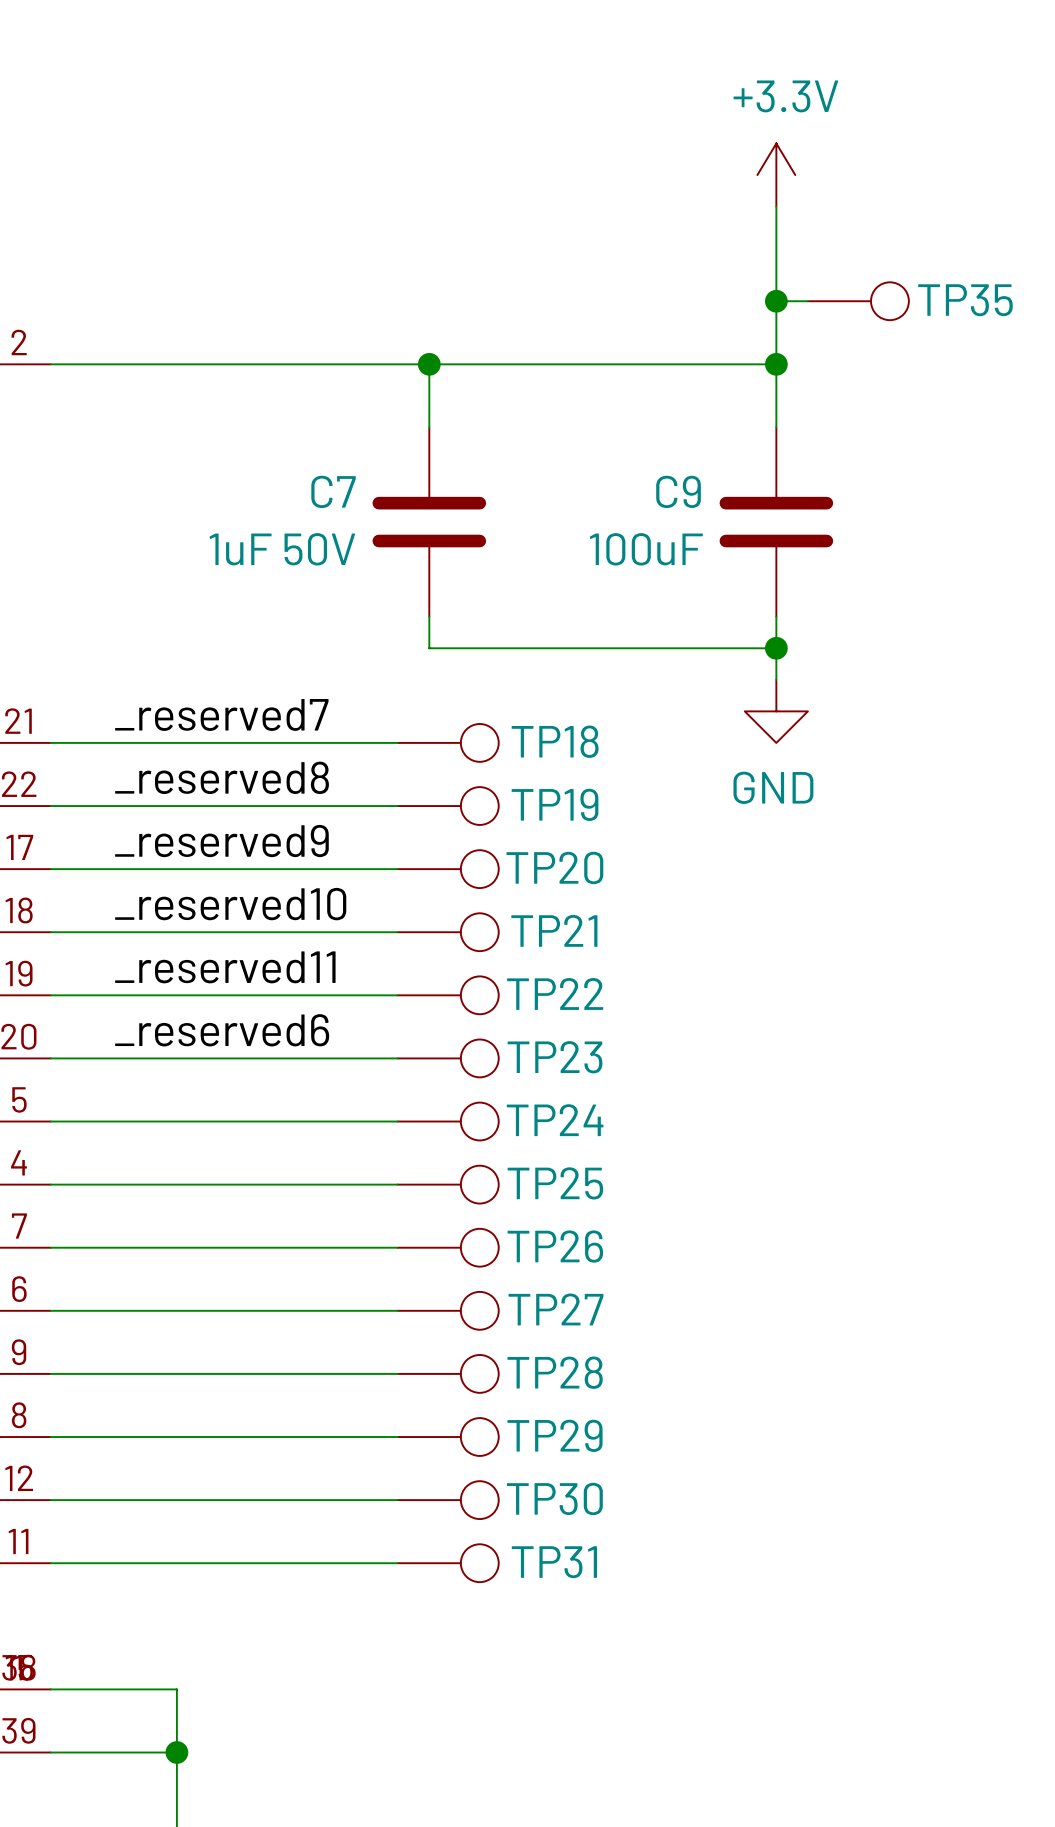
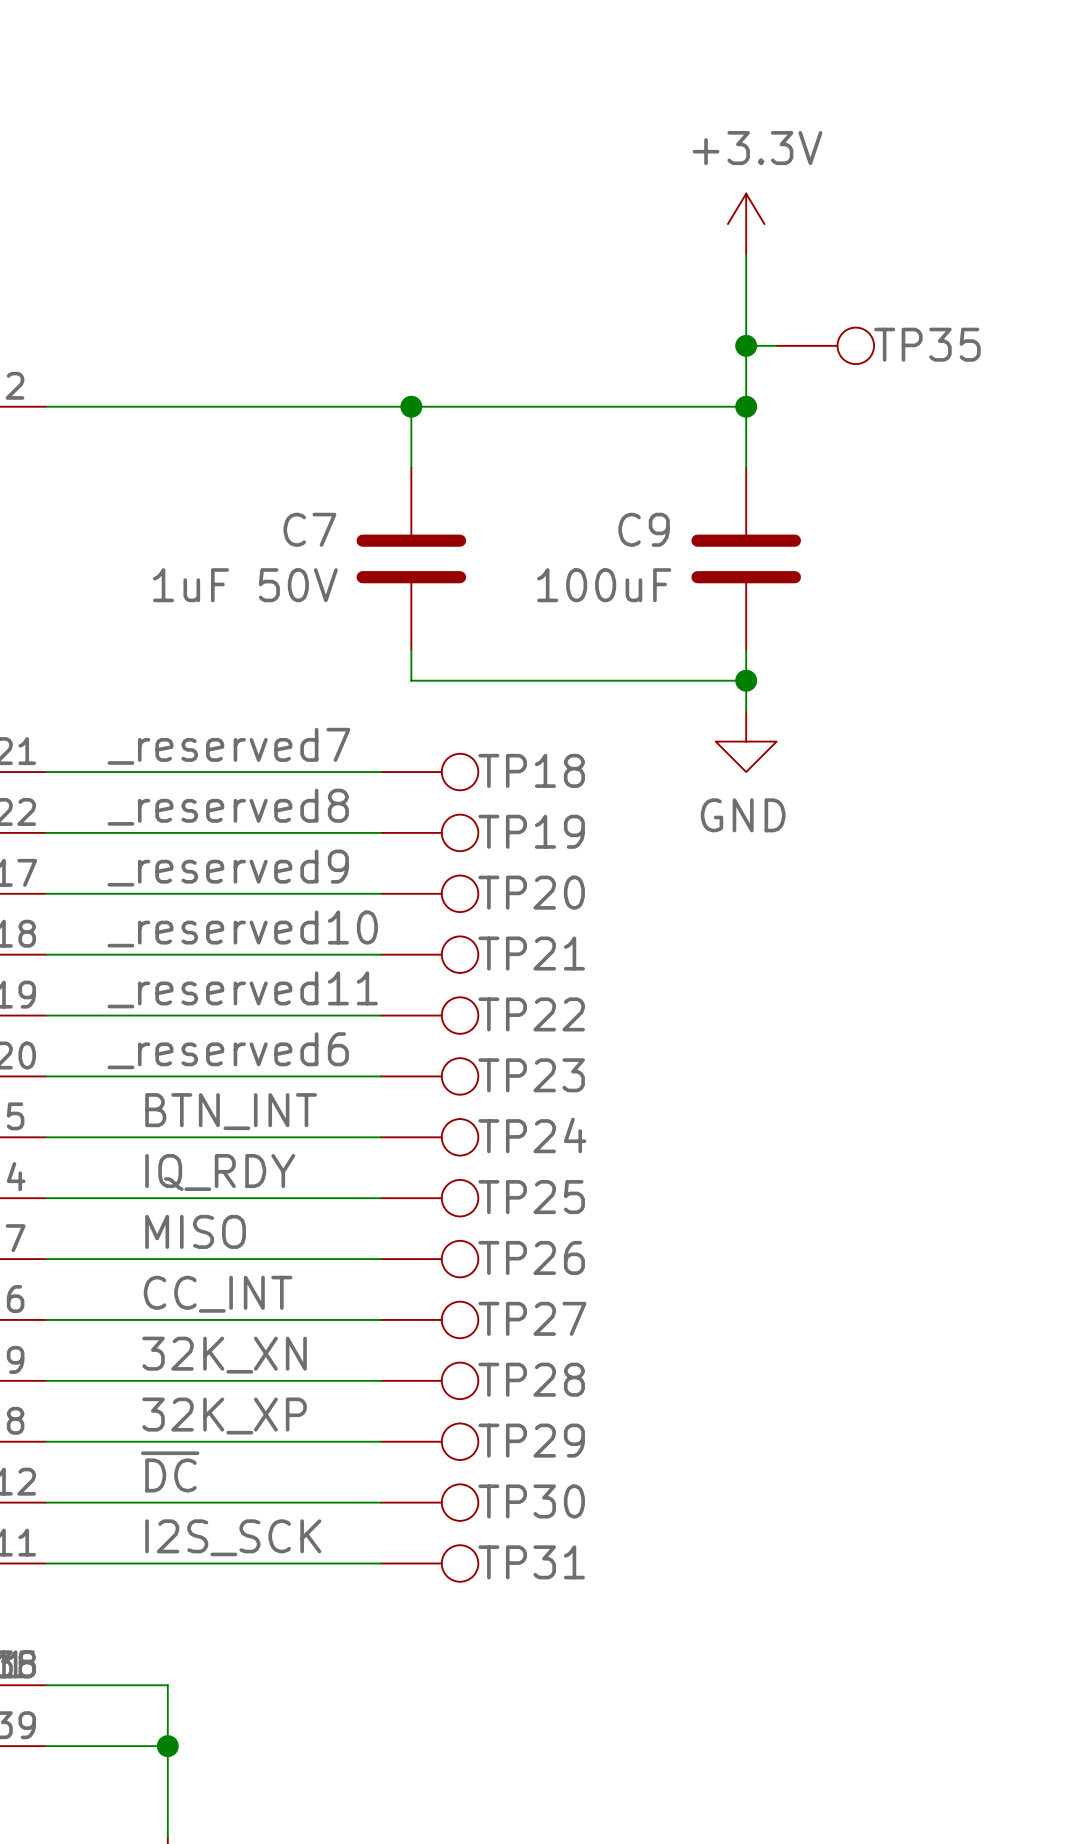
label: none -> BTN_INT (231, 1111)
label: none -> IQ_RDY (220, 1172)
label: none -> MISO (195, 1231)
label: none -> CC_INT (218, 1294)
label: none -> 32K_XN (224, 1355)
label: none -> 32K_XP (224, 1416)
label: none -> ~{DC} (170, 1471)
label: none -> I2S_SCK (233, 1537)

